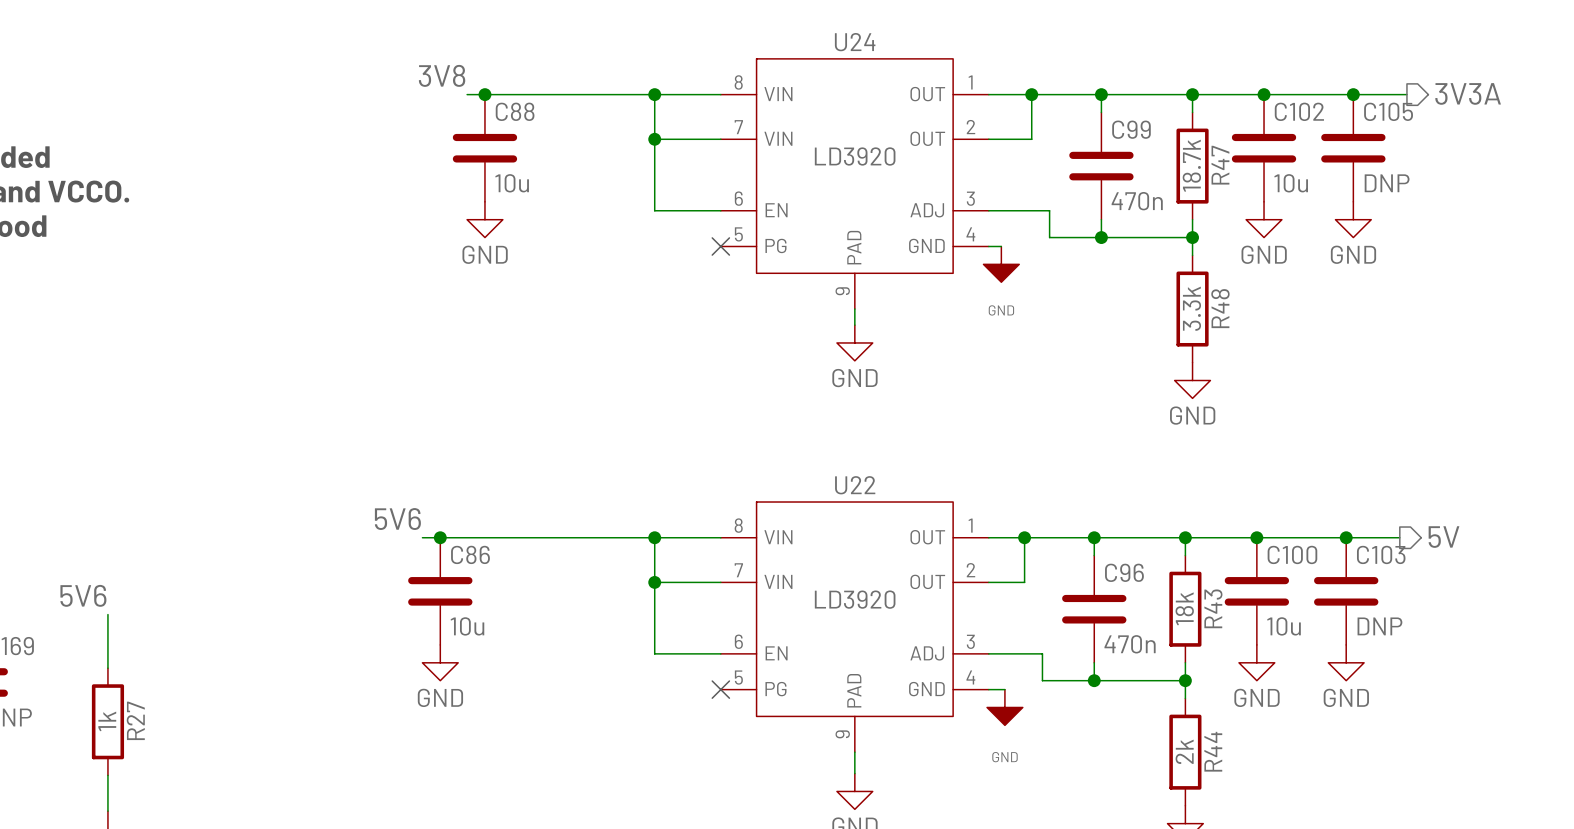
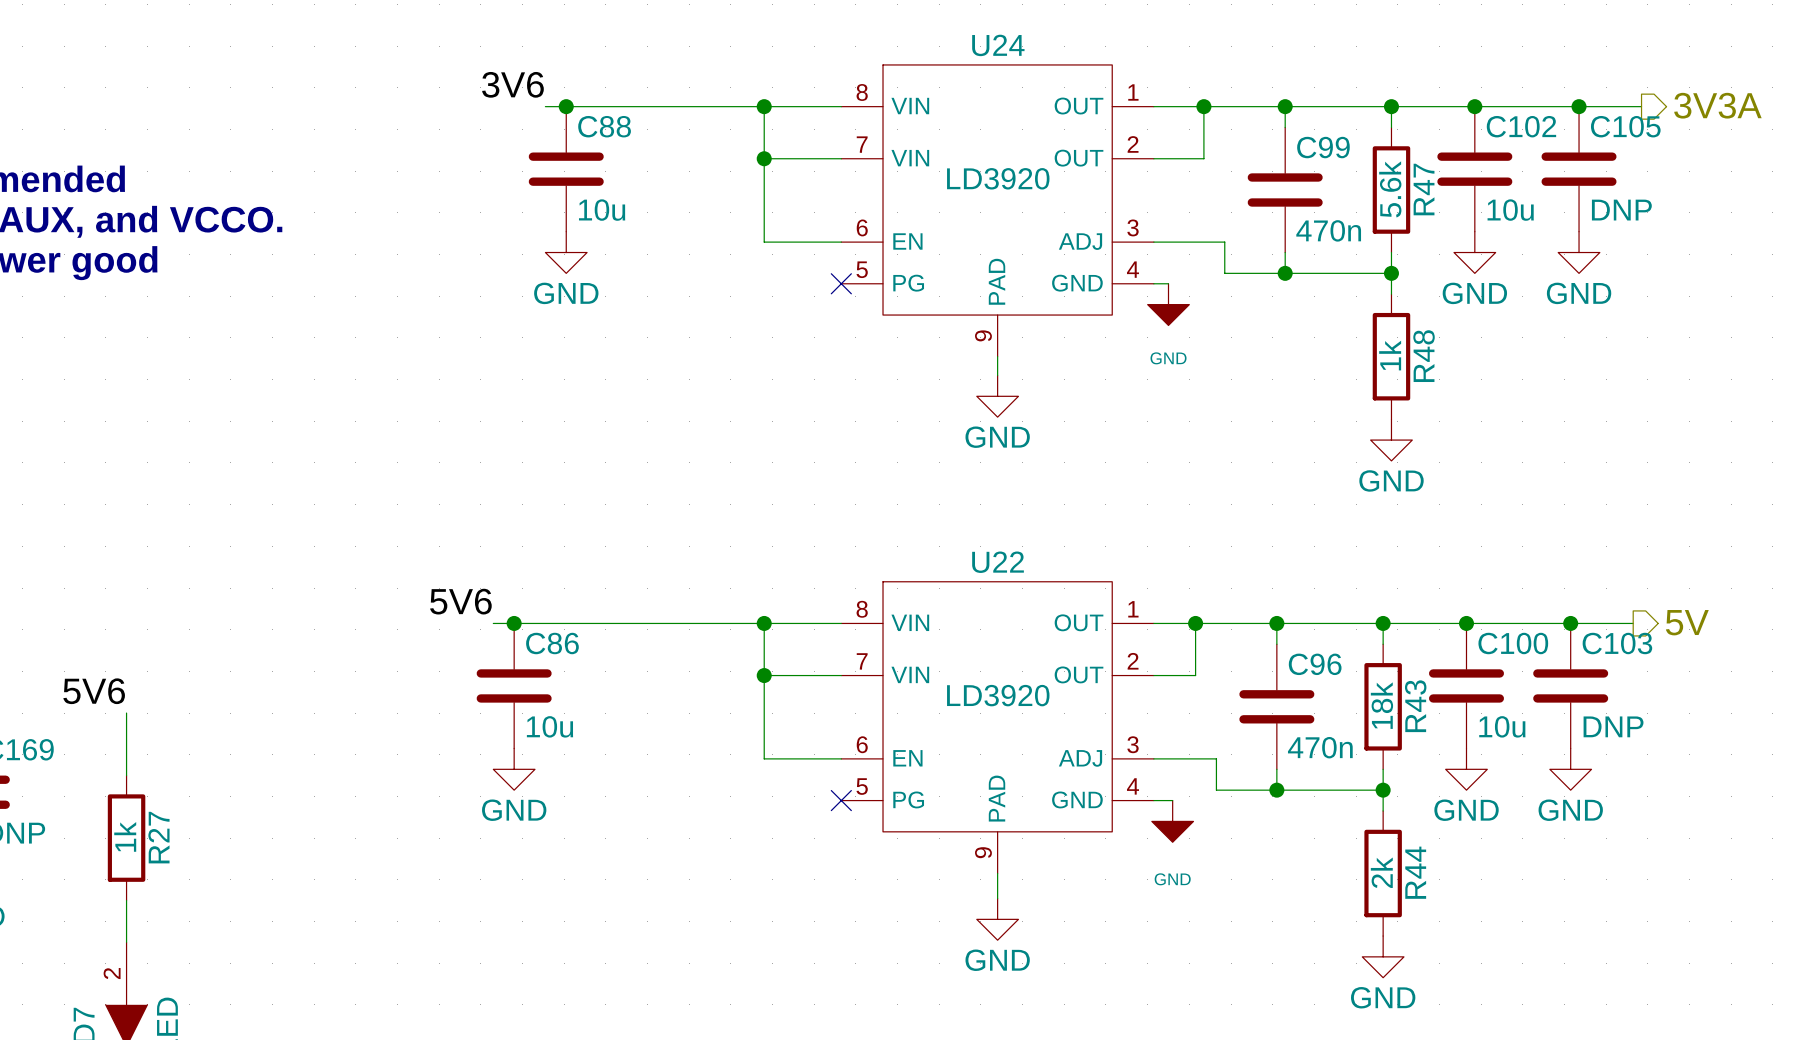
label: 3V8 (442, 75) -> 3V6 (512, 84)
R47 value: 18.7k (1191, 165) -> 5.6k (1390, 189)
R48 value: 3.3k (1191, 308) -> 1k (1390, 355)

